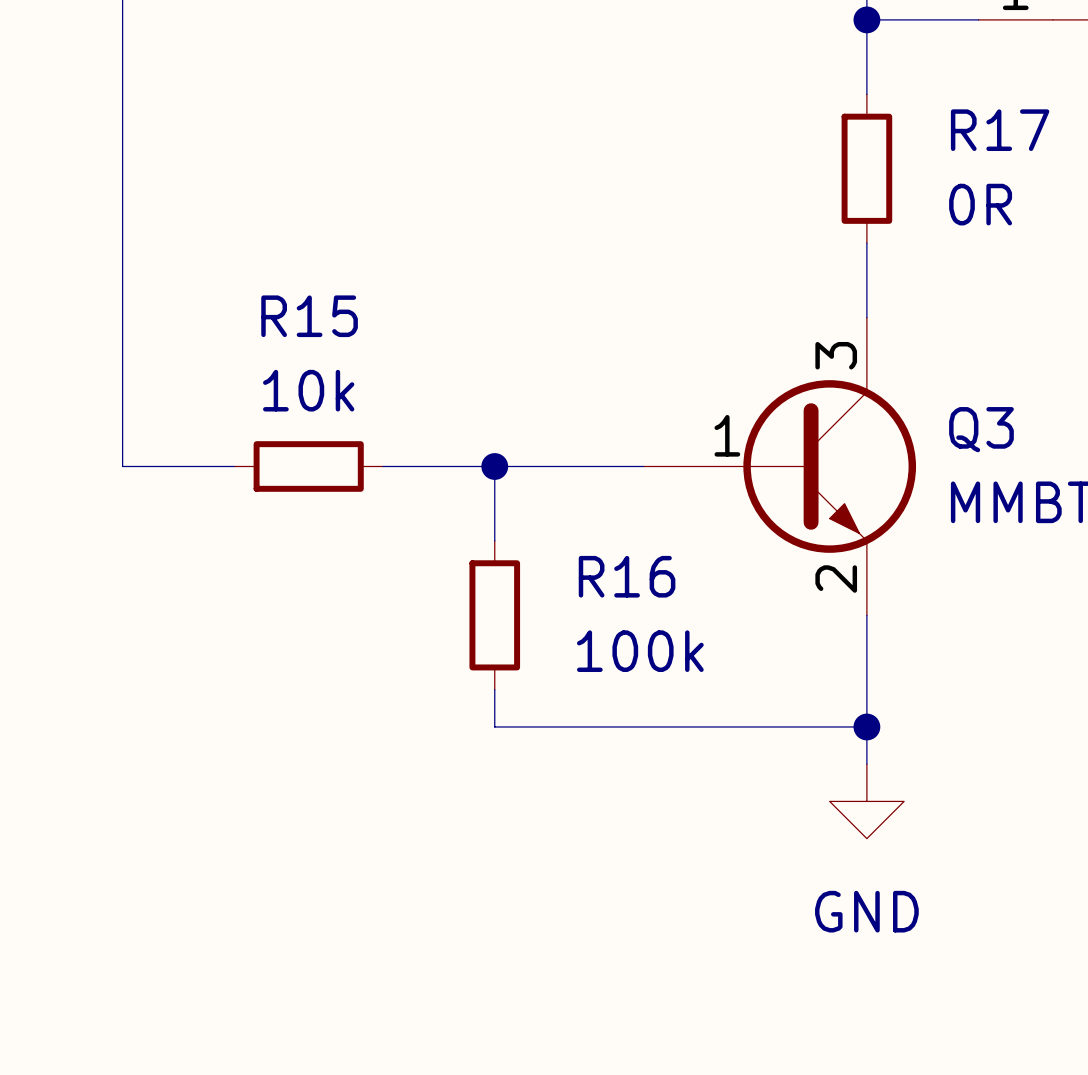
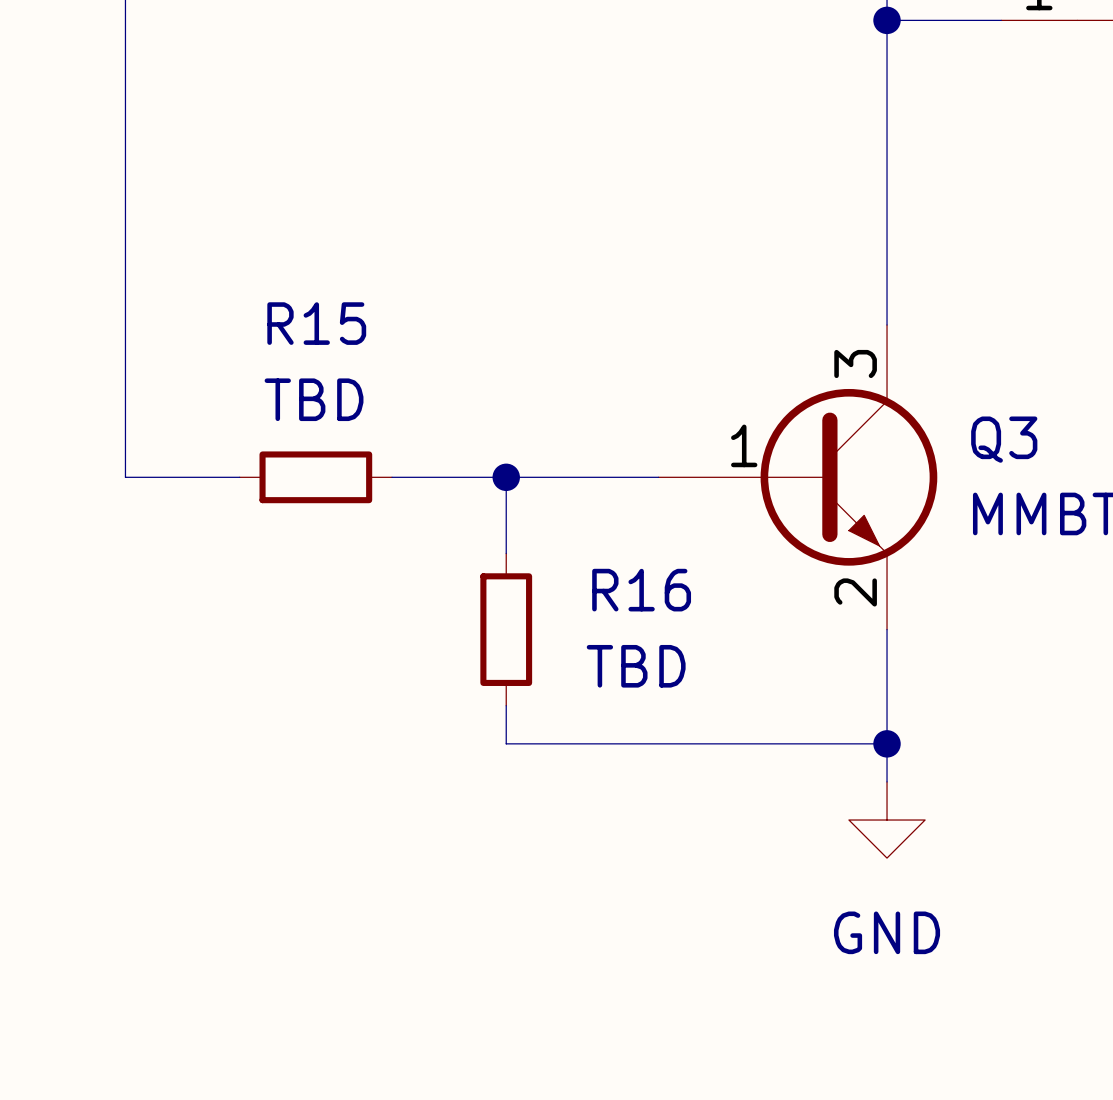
wire: none -> (887, 96) (887, 248)
R17: 0R (866, 168) -> none
R15 value: 10k (308, 390) -> TBD (314, 399)
R16 value: 100k (640, 651) -> TBD (636, 666)

